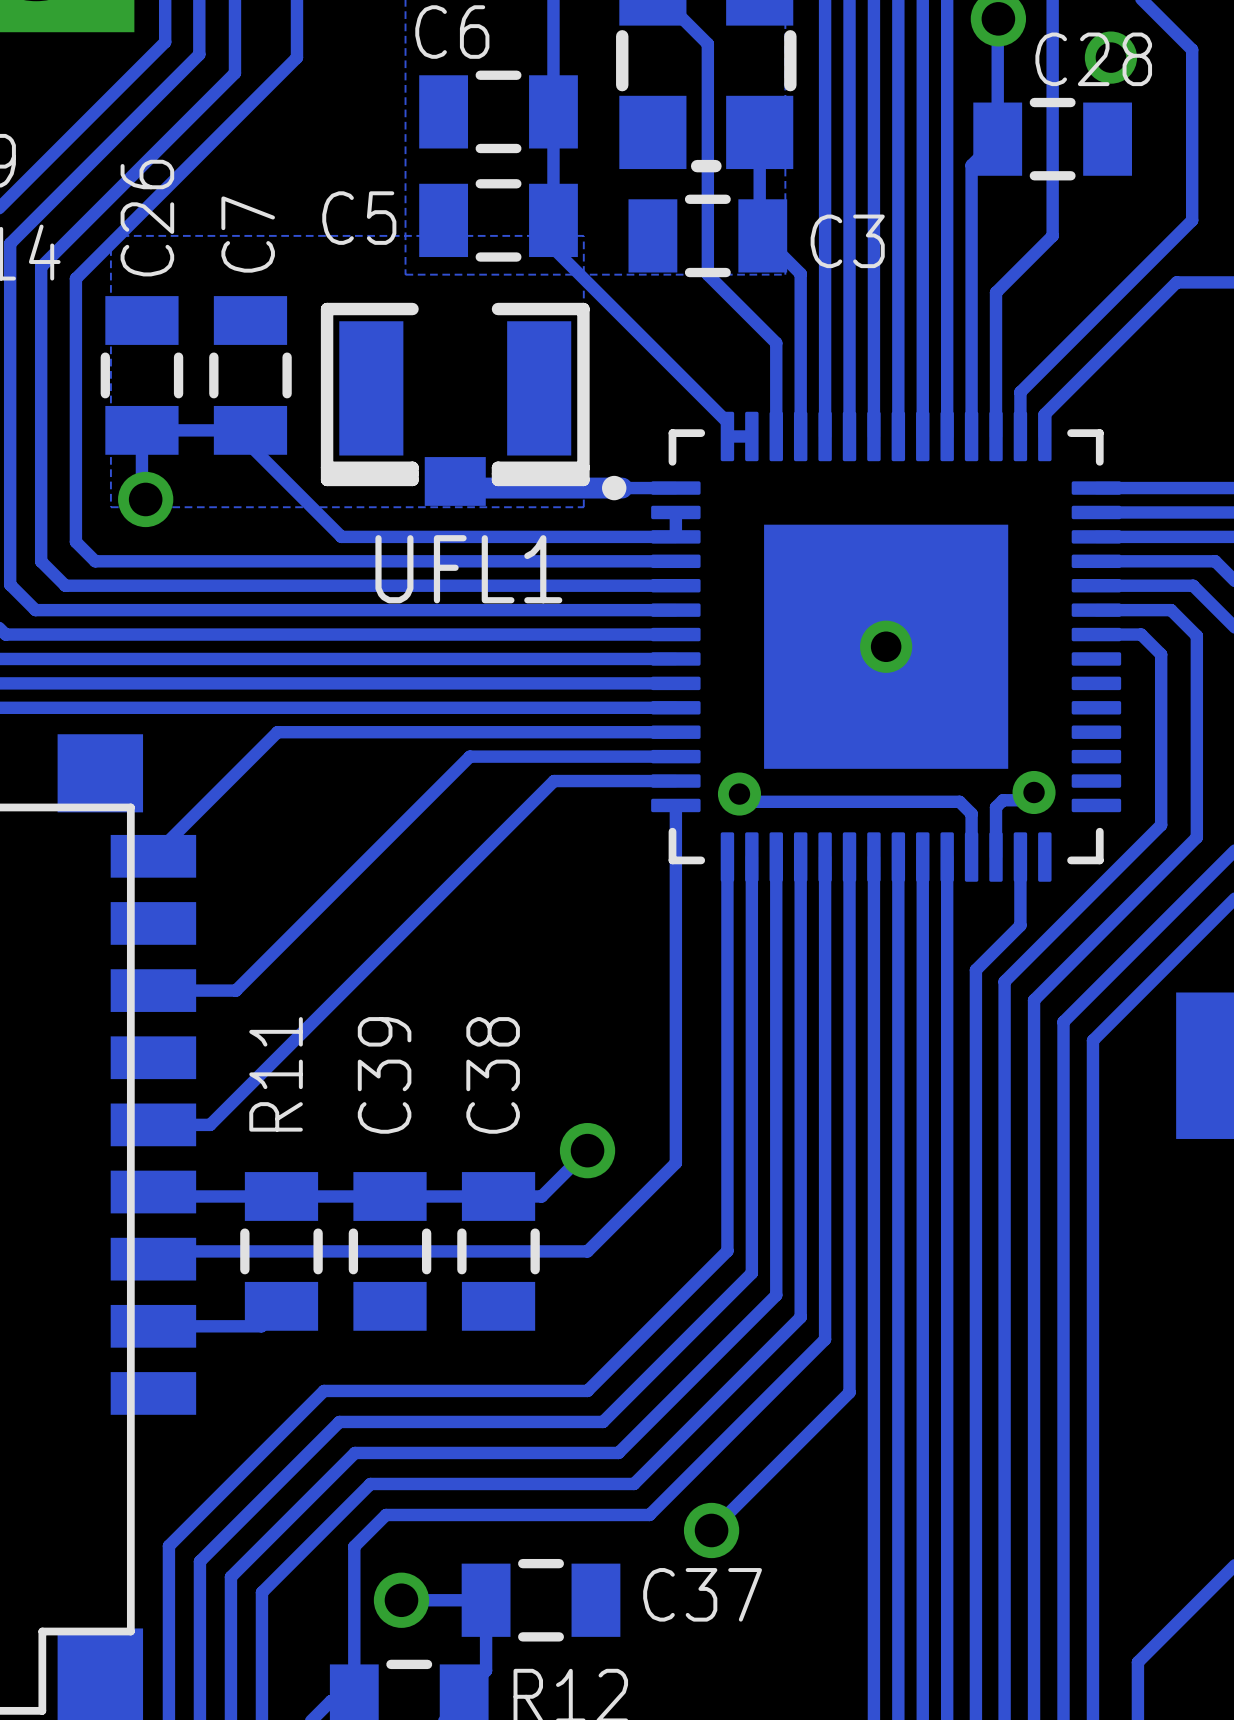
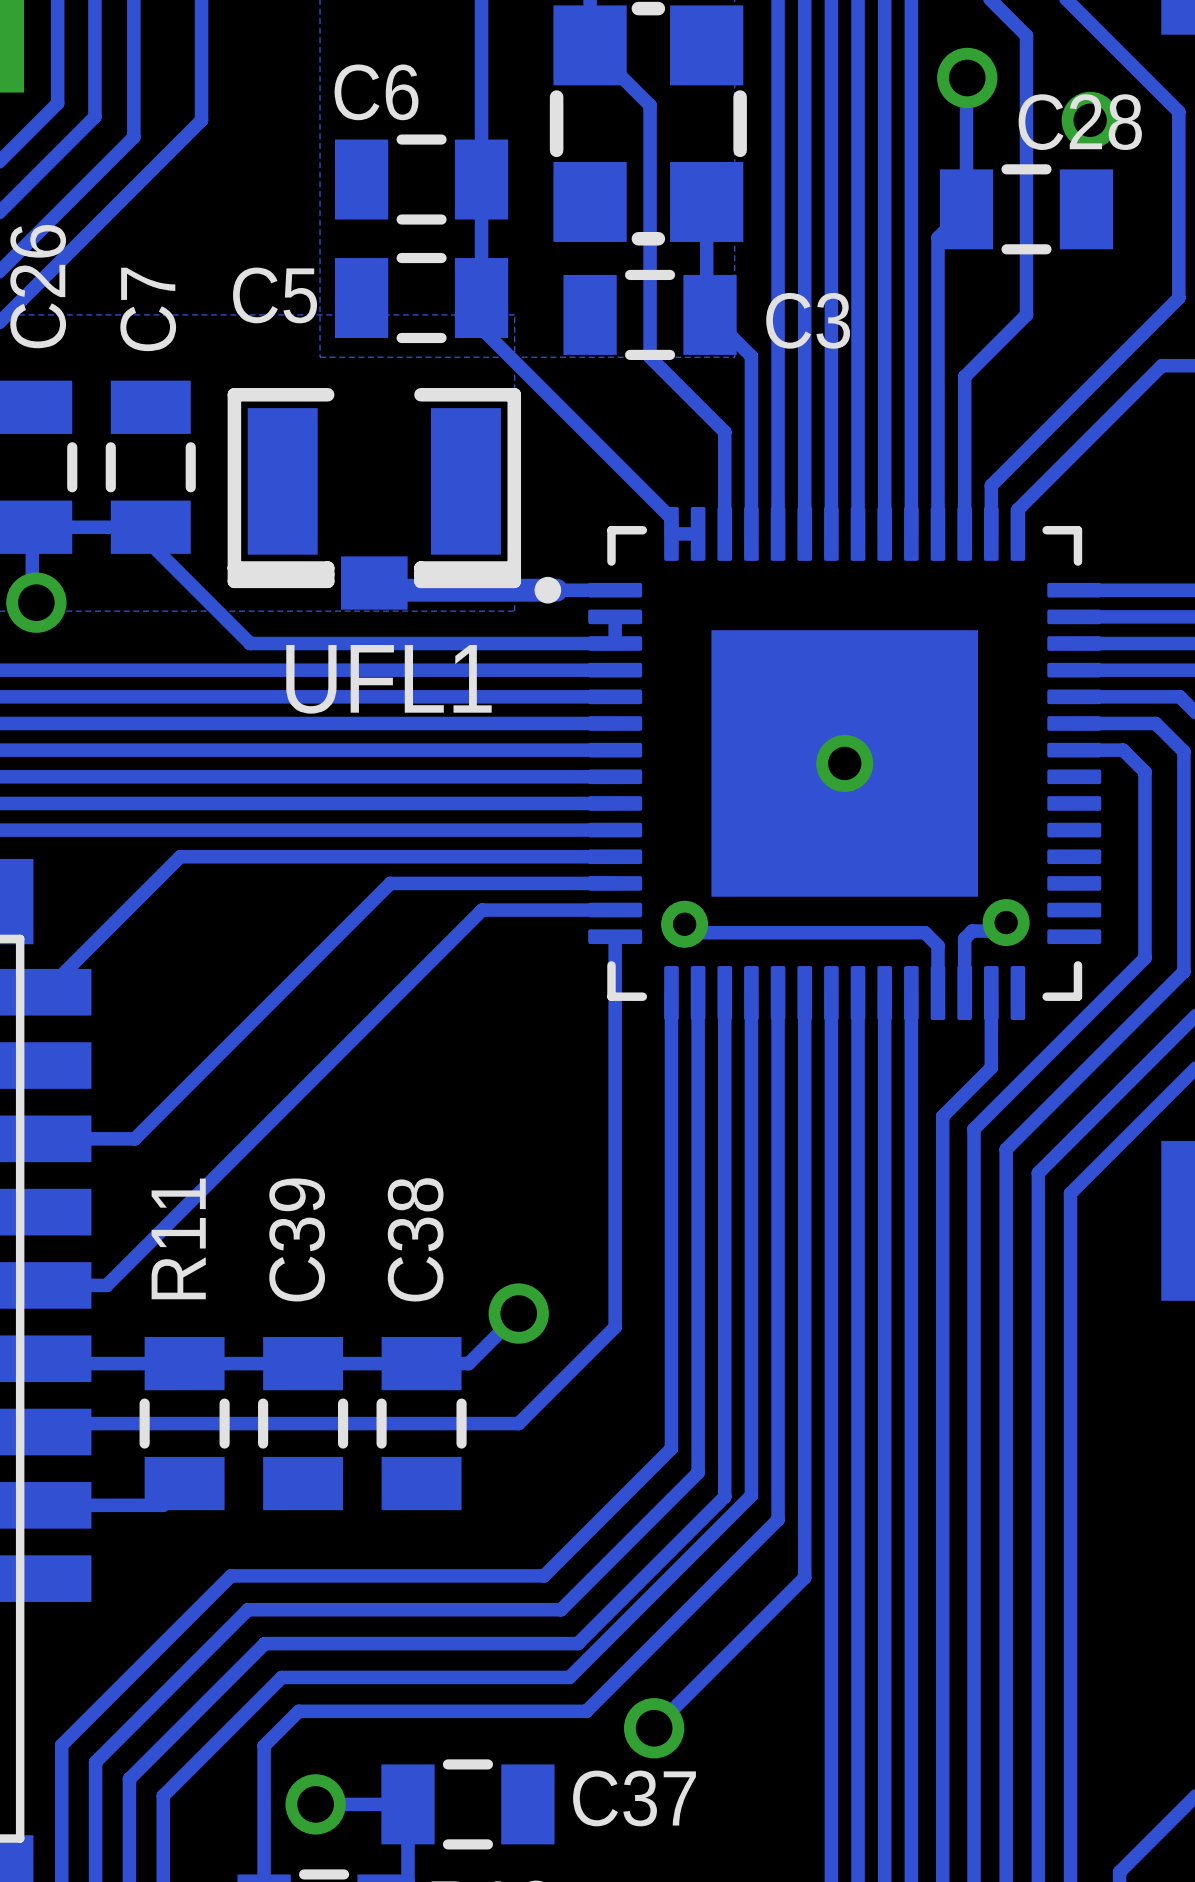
track: (727, 1251) (587, 1390) -> (671, 1423) (671, 1448) (544, 1575) (518, 1575)
track: (751, 1273) (603, 1421) -> (698, 1447) (698, 1472) (561, 1609) (535, 1609)
track: (776, 1295) (618, 1452) -> (724, 1471) (724, 1496) (577, 1643) (552, 1643)

